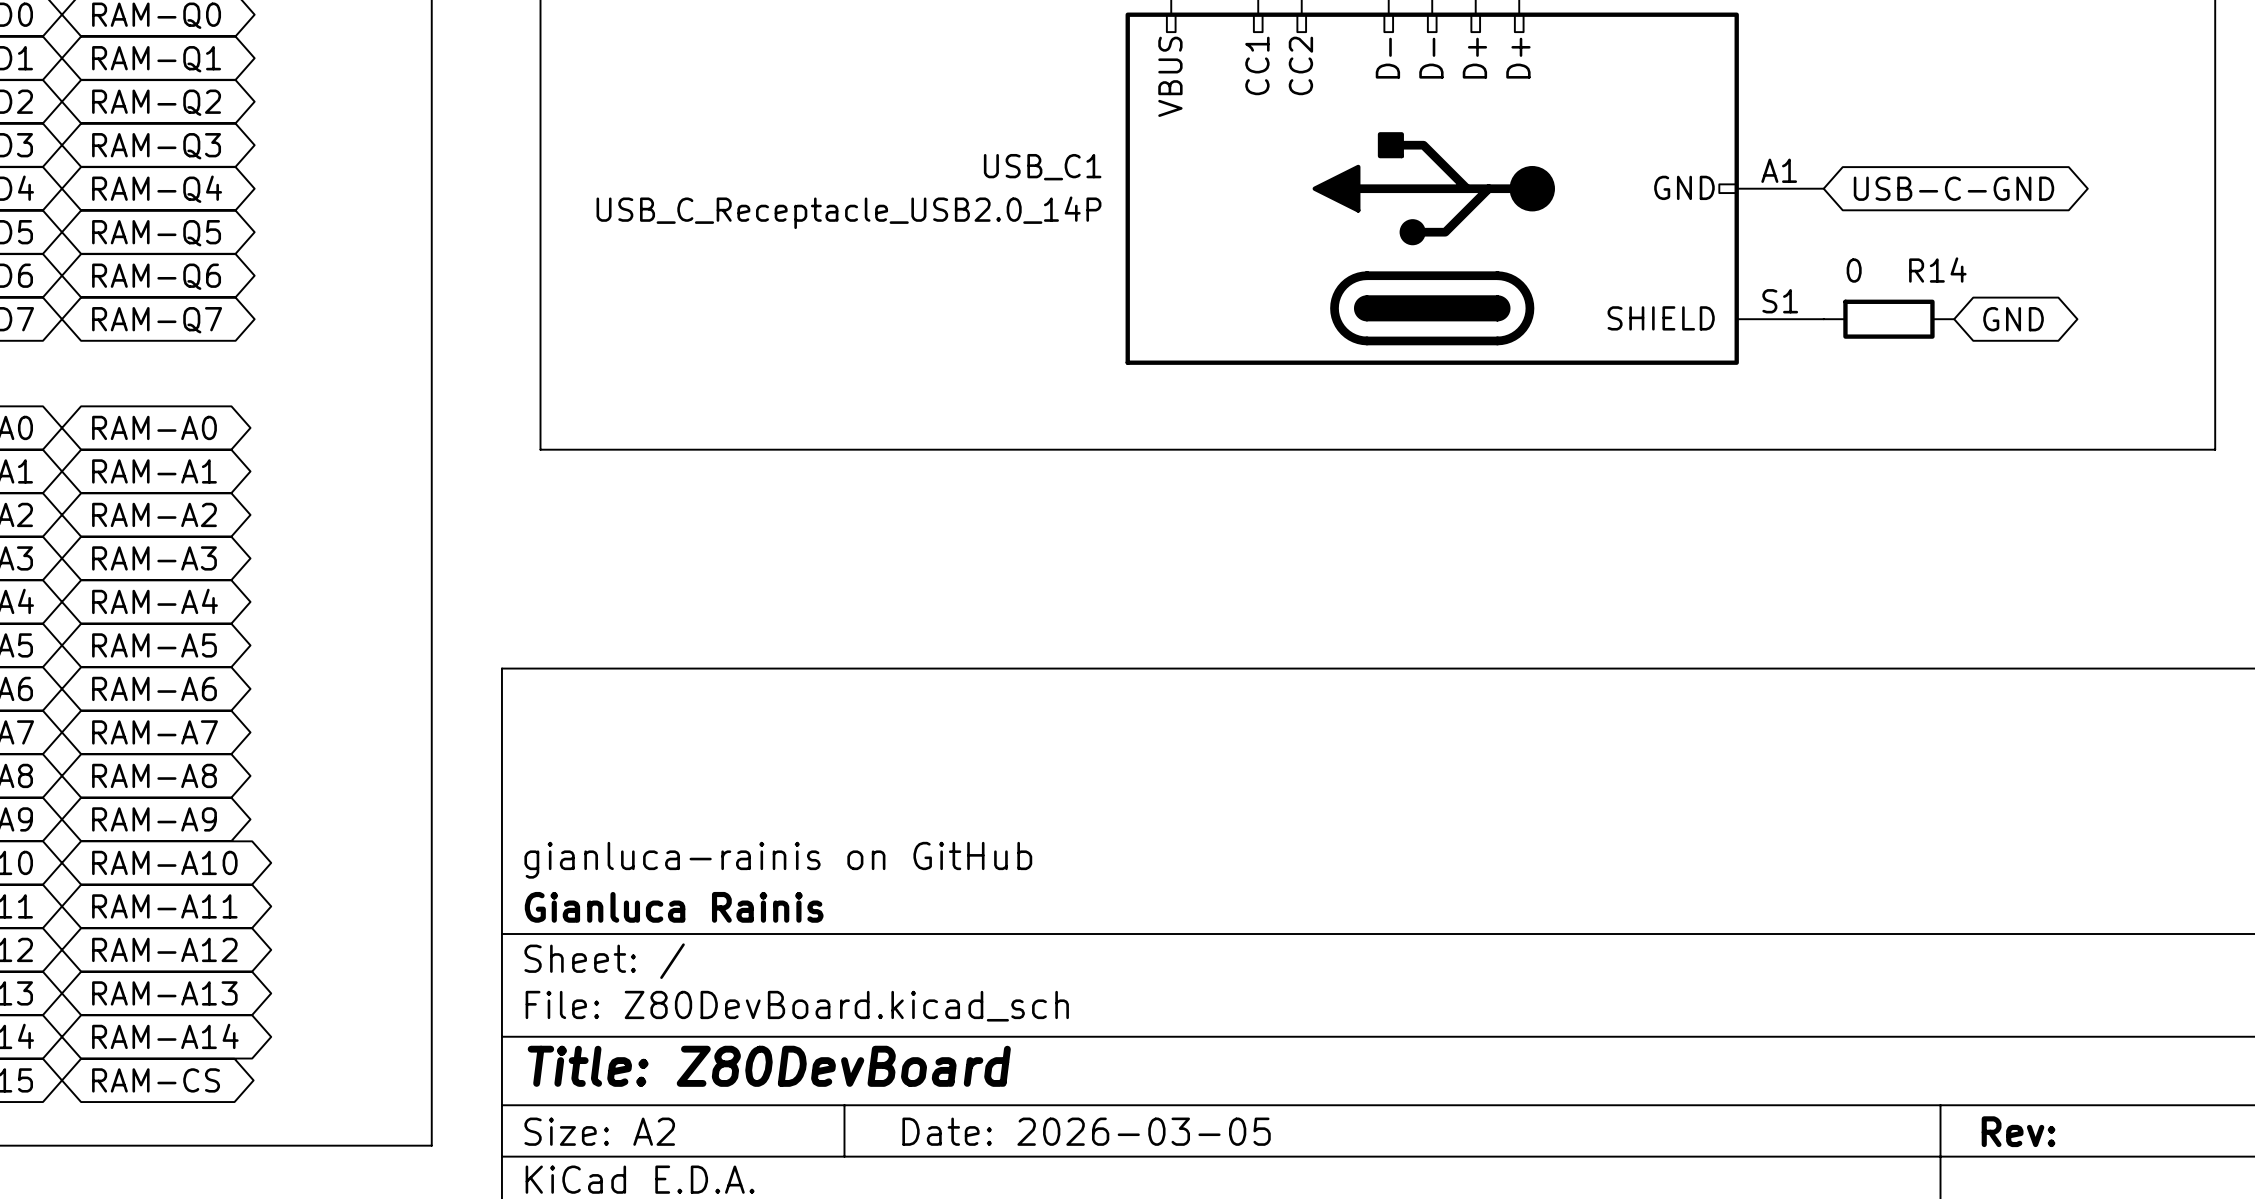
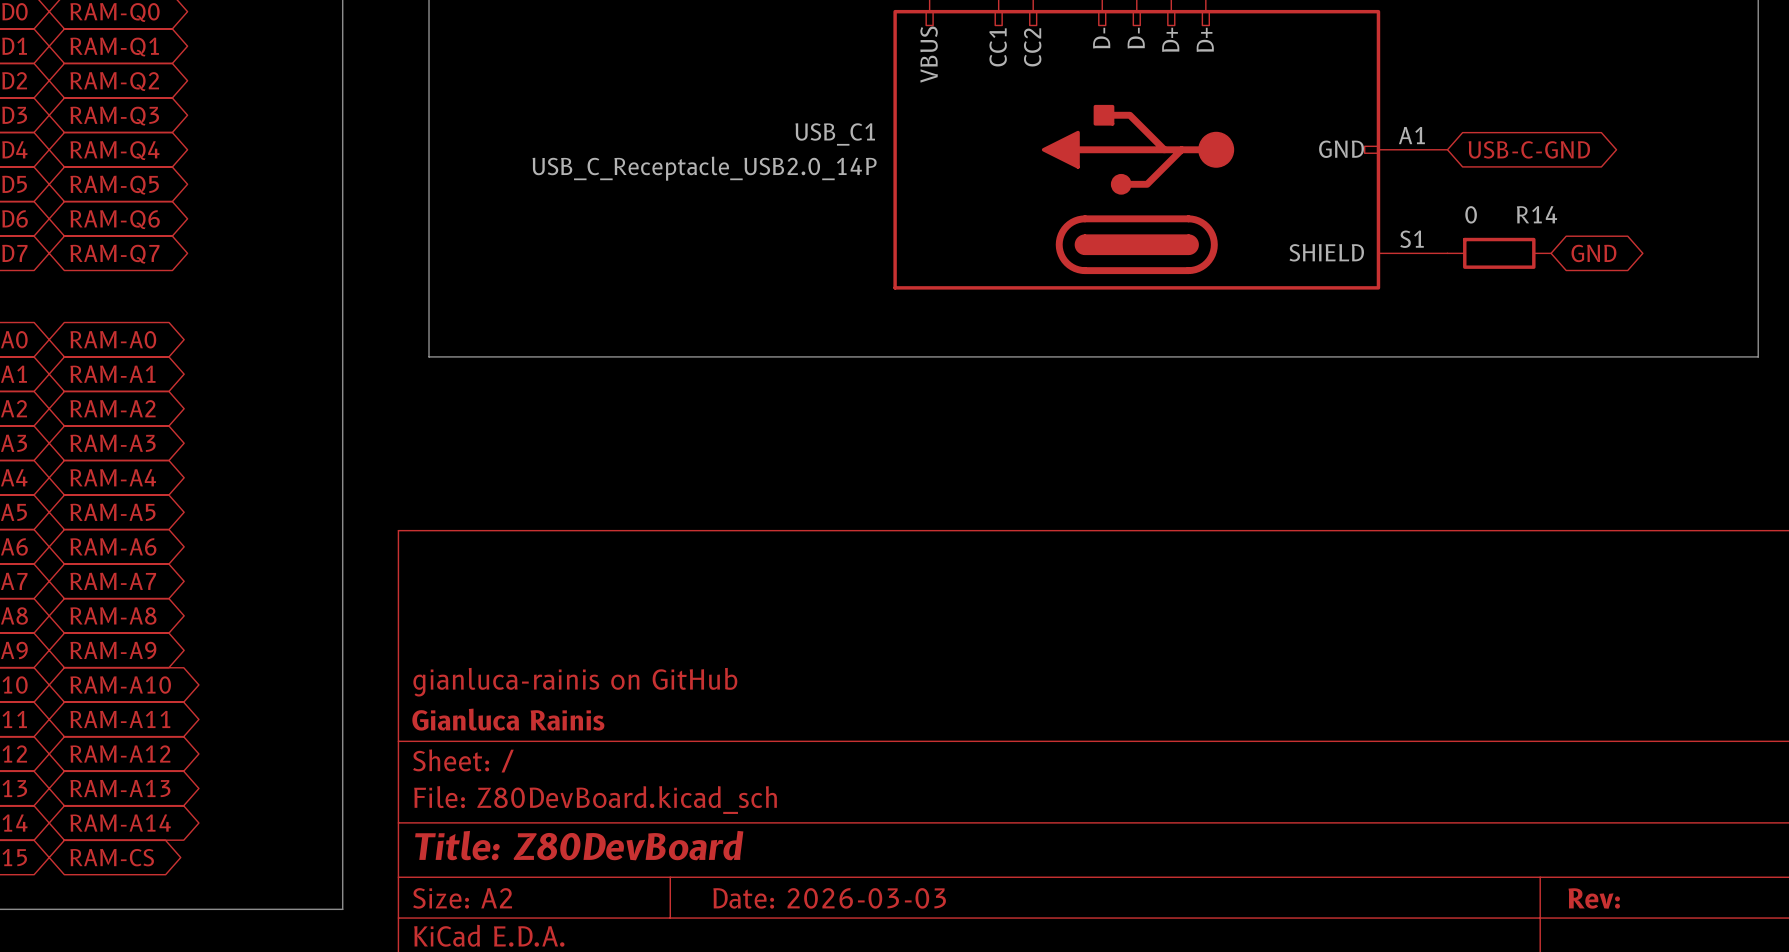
title block: Date: 2026-03-05 (1086, 1131) -> Date: 2026-03-03 (829, 898)

